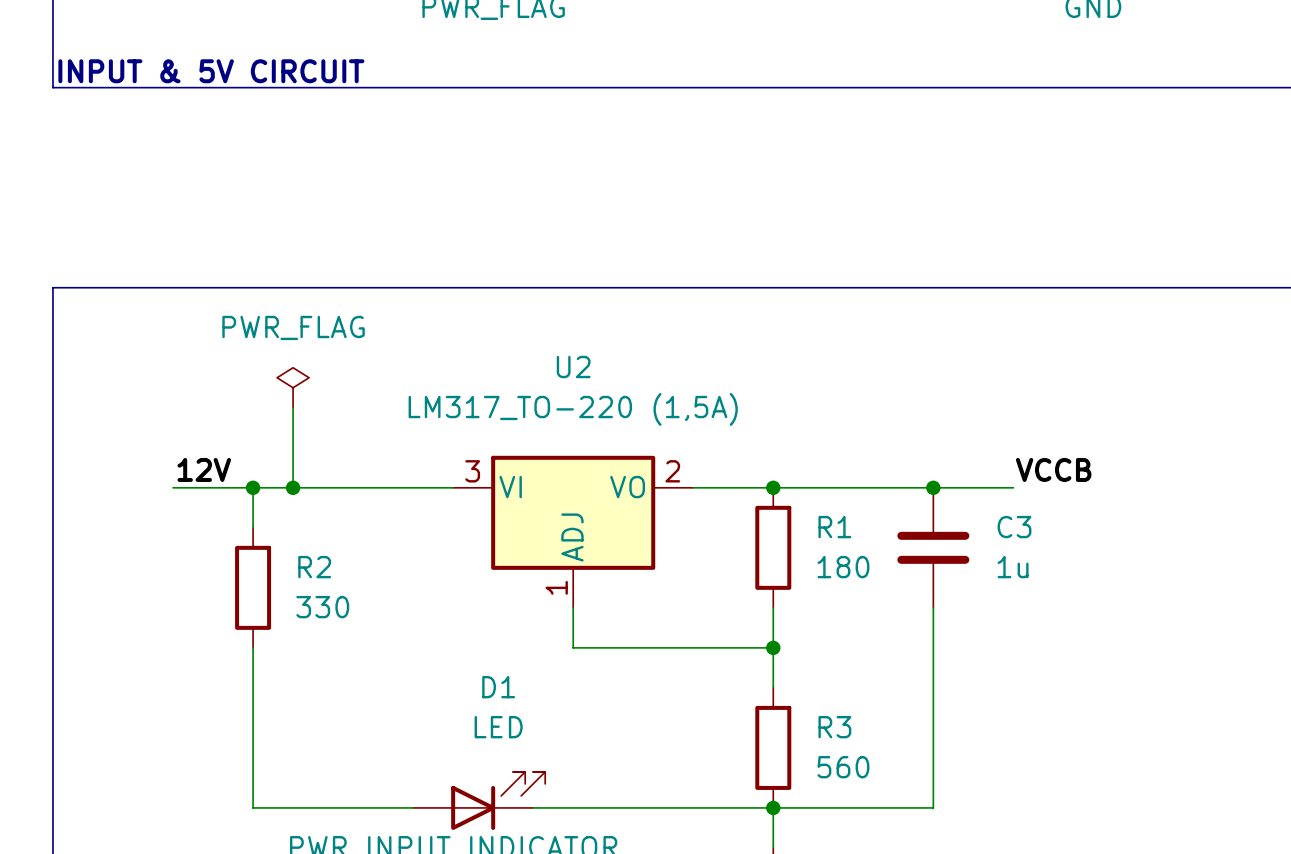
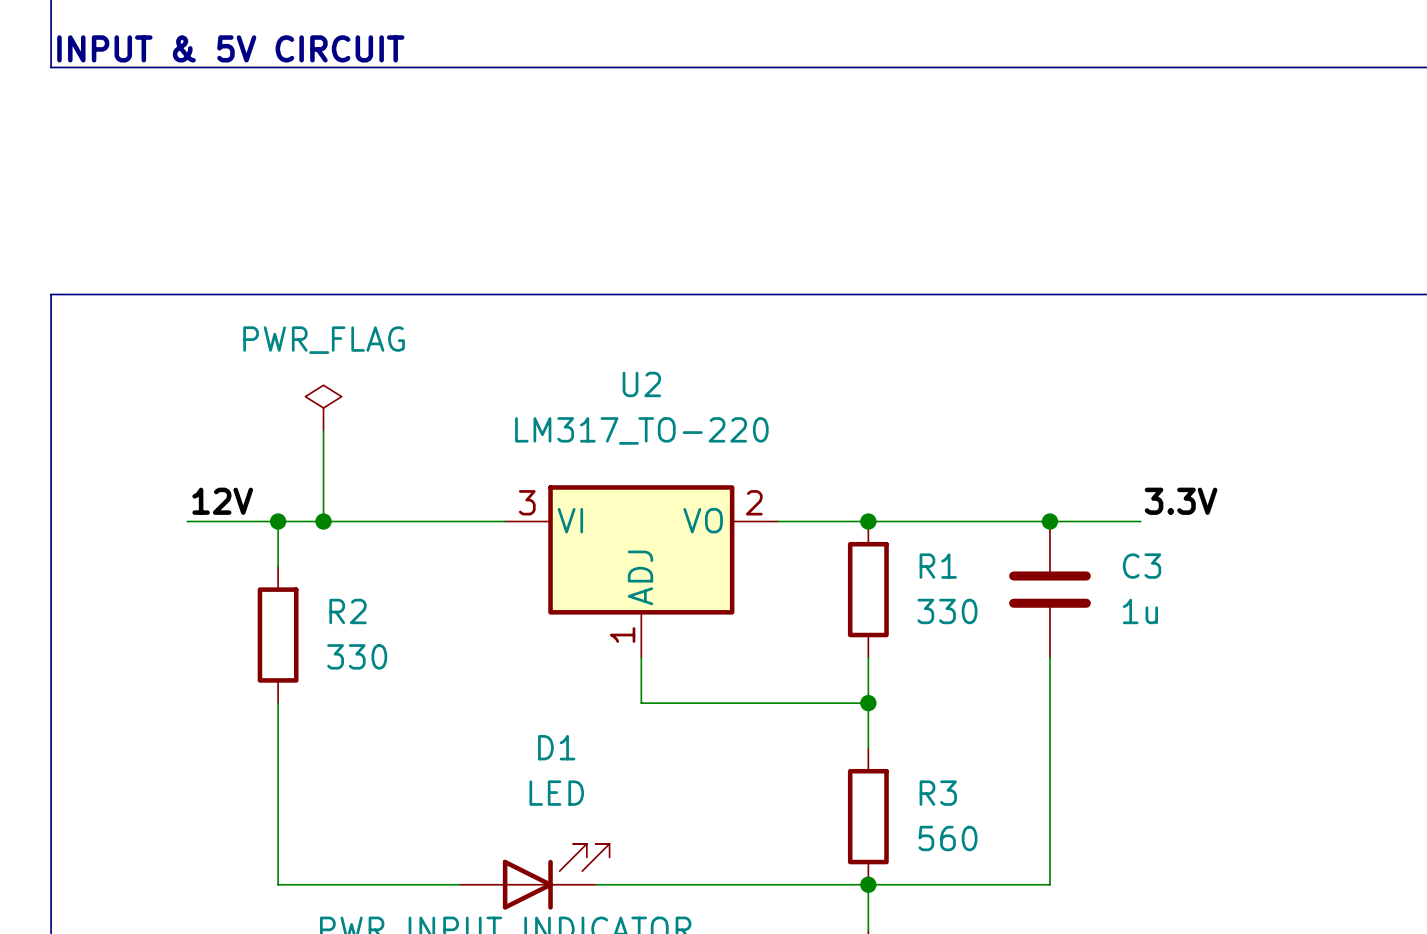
U2 value: LM317_TO-220 (1,5A) (573, 409) -> LM317_TO-220 (641, 430)
label: VCCB (1053, 469) -> 3.3V (1181, 501)
R1 value: 180 (843, 567) -> 330 (947, 611)

